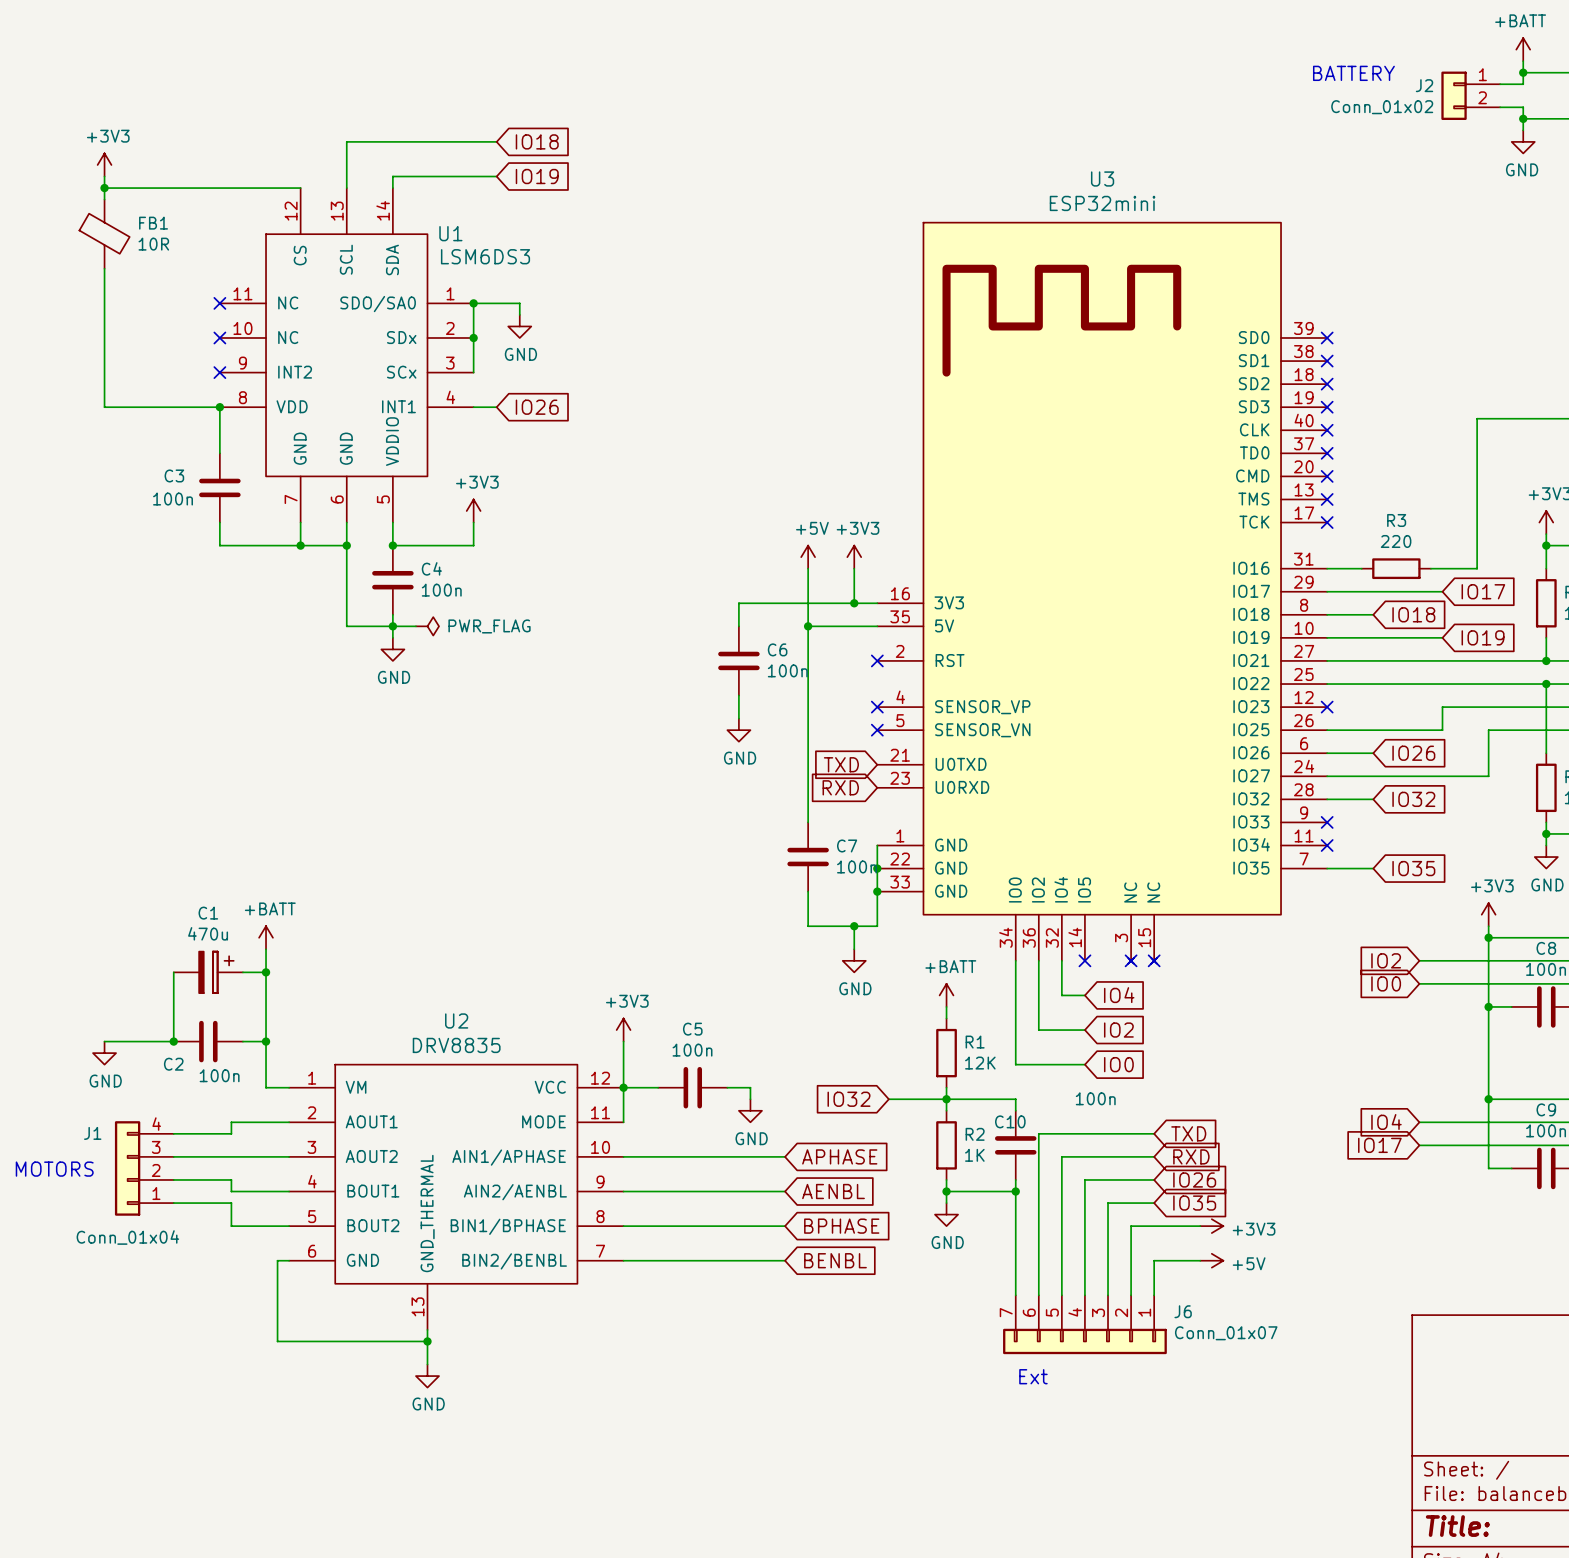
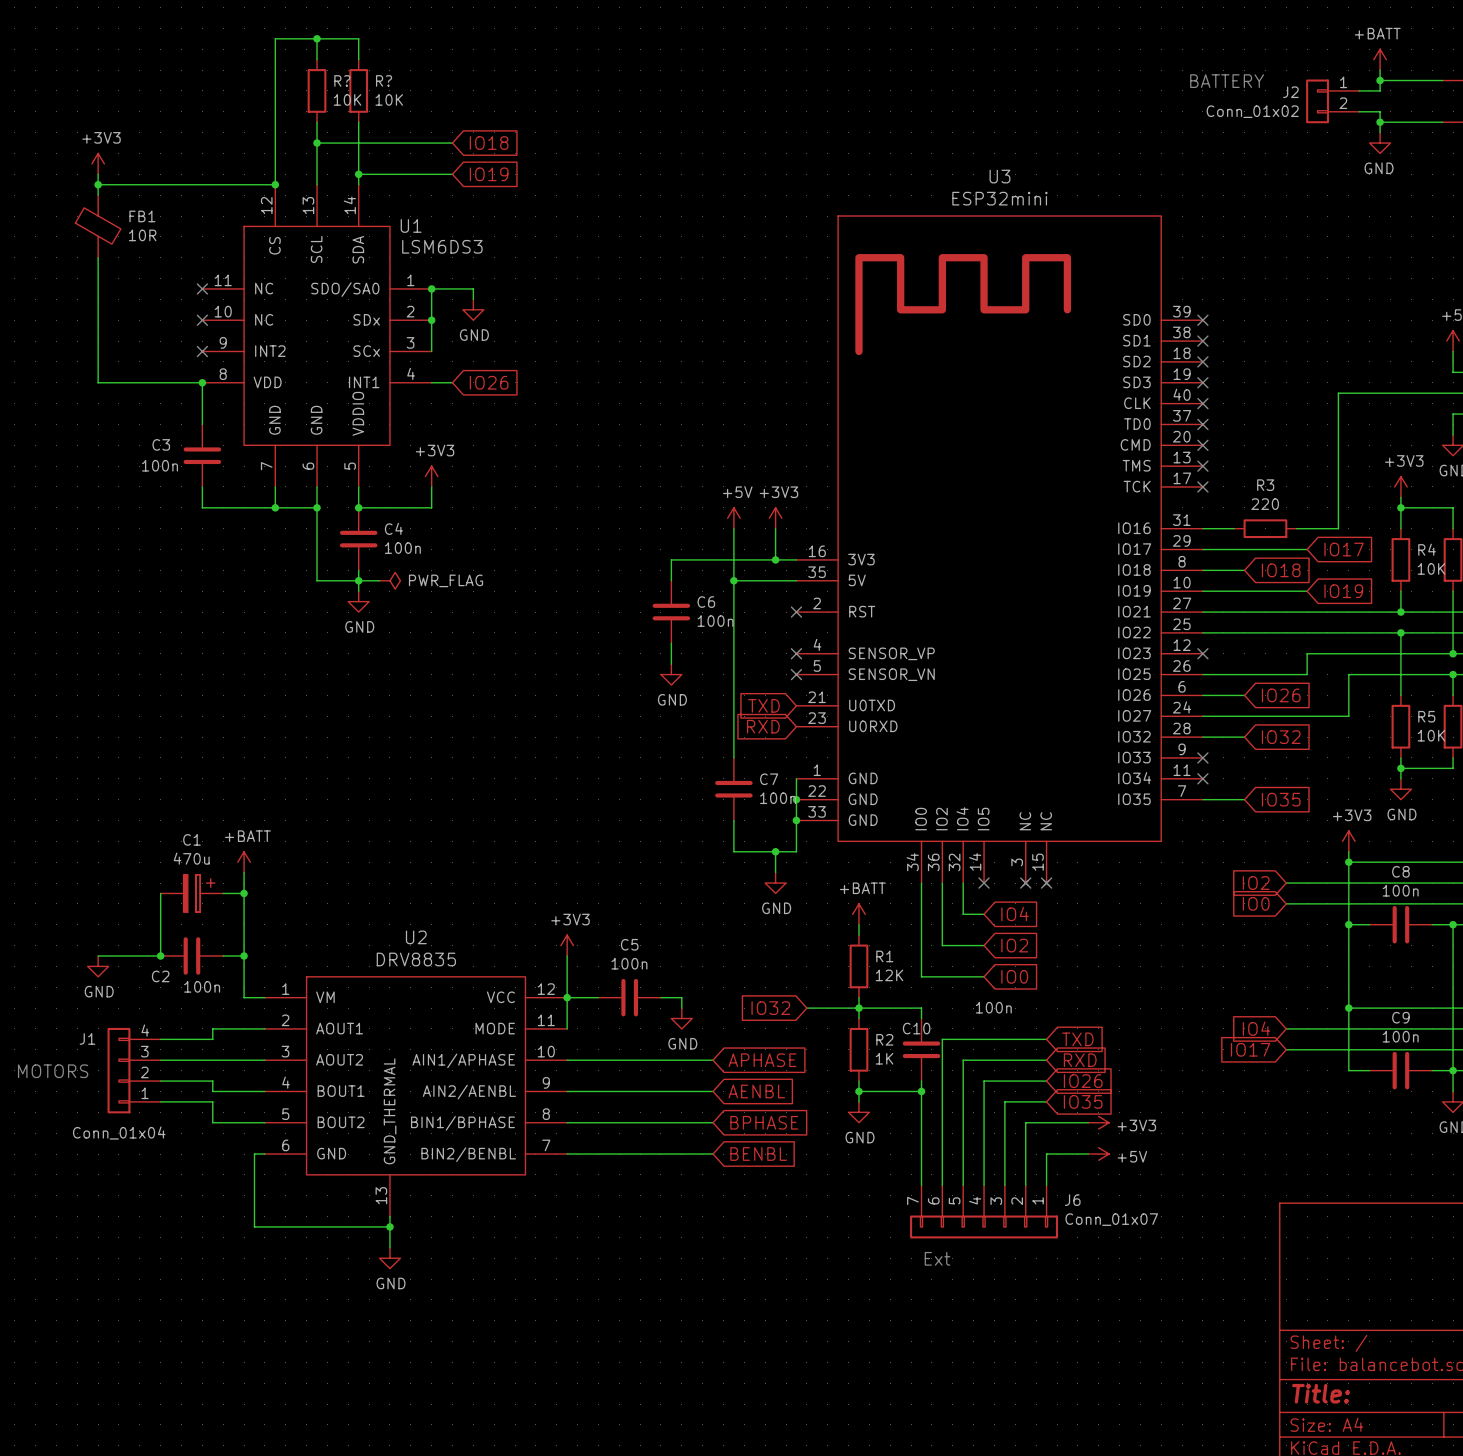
wire: none -> (317, 38) (317, 59)
junction: none -> (317, 38)
wire: none -> (358, 59) (358, 38) (275, 38) (275, 184)
R?: none -> 10K (317, 90)
R?: none -> 10K (358, 90)
wire: none -> (317, 122) (317, 143)
wire: none -> (358, 122) (358, 174)
junction: none -> (317, 143)
junction: none -> (358, 174)
junction: none -> (275, 184)

